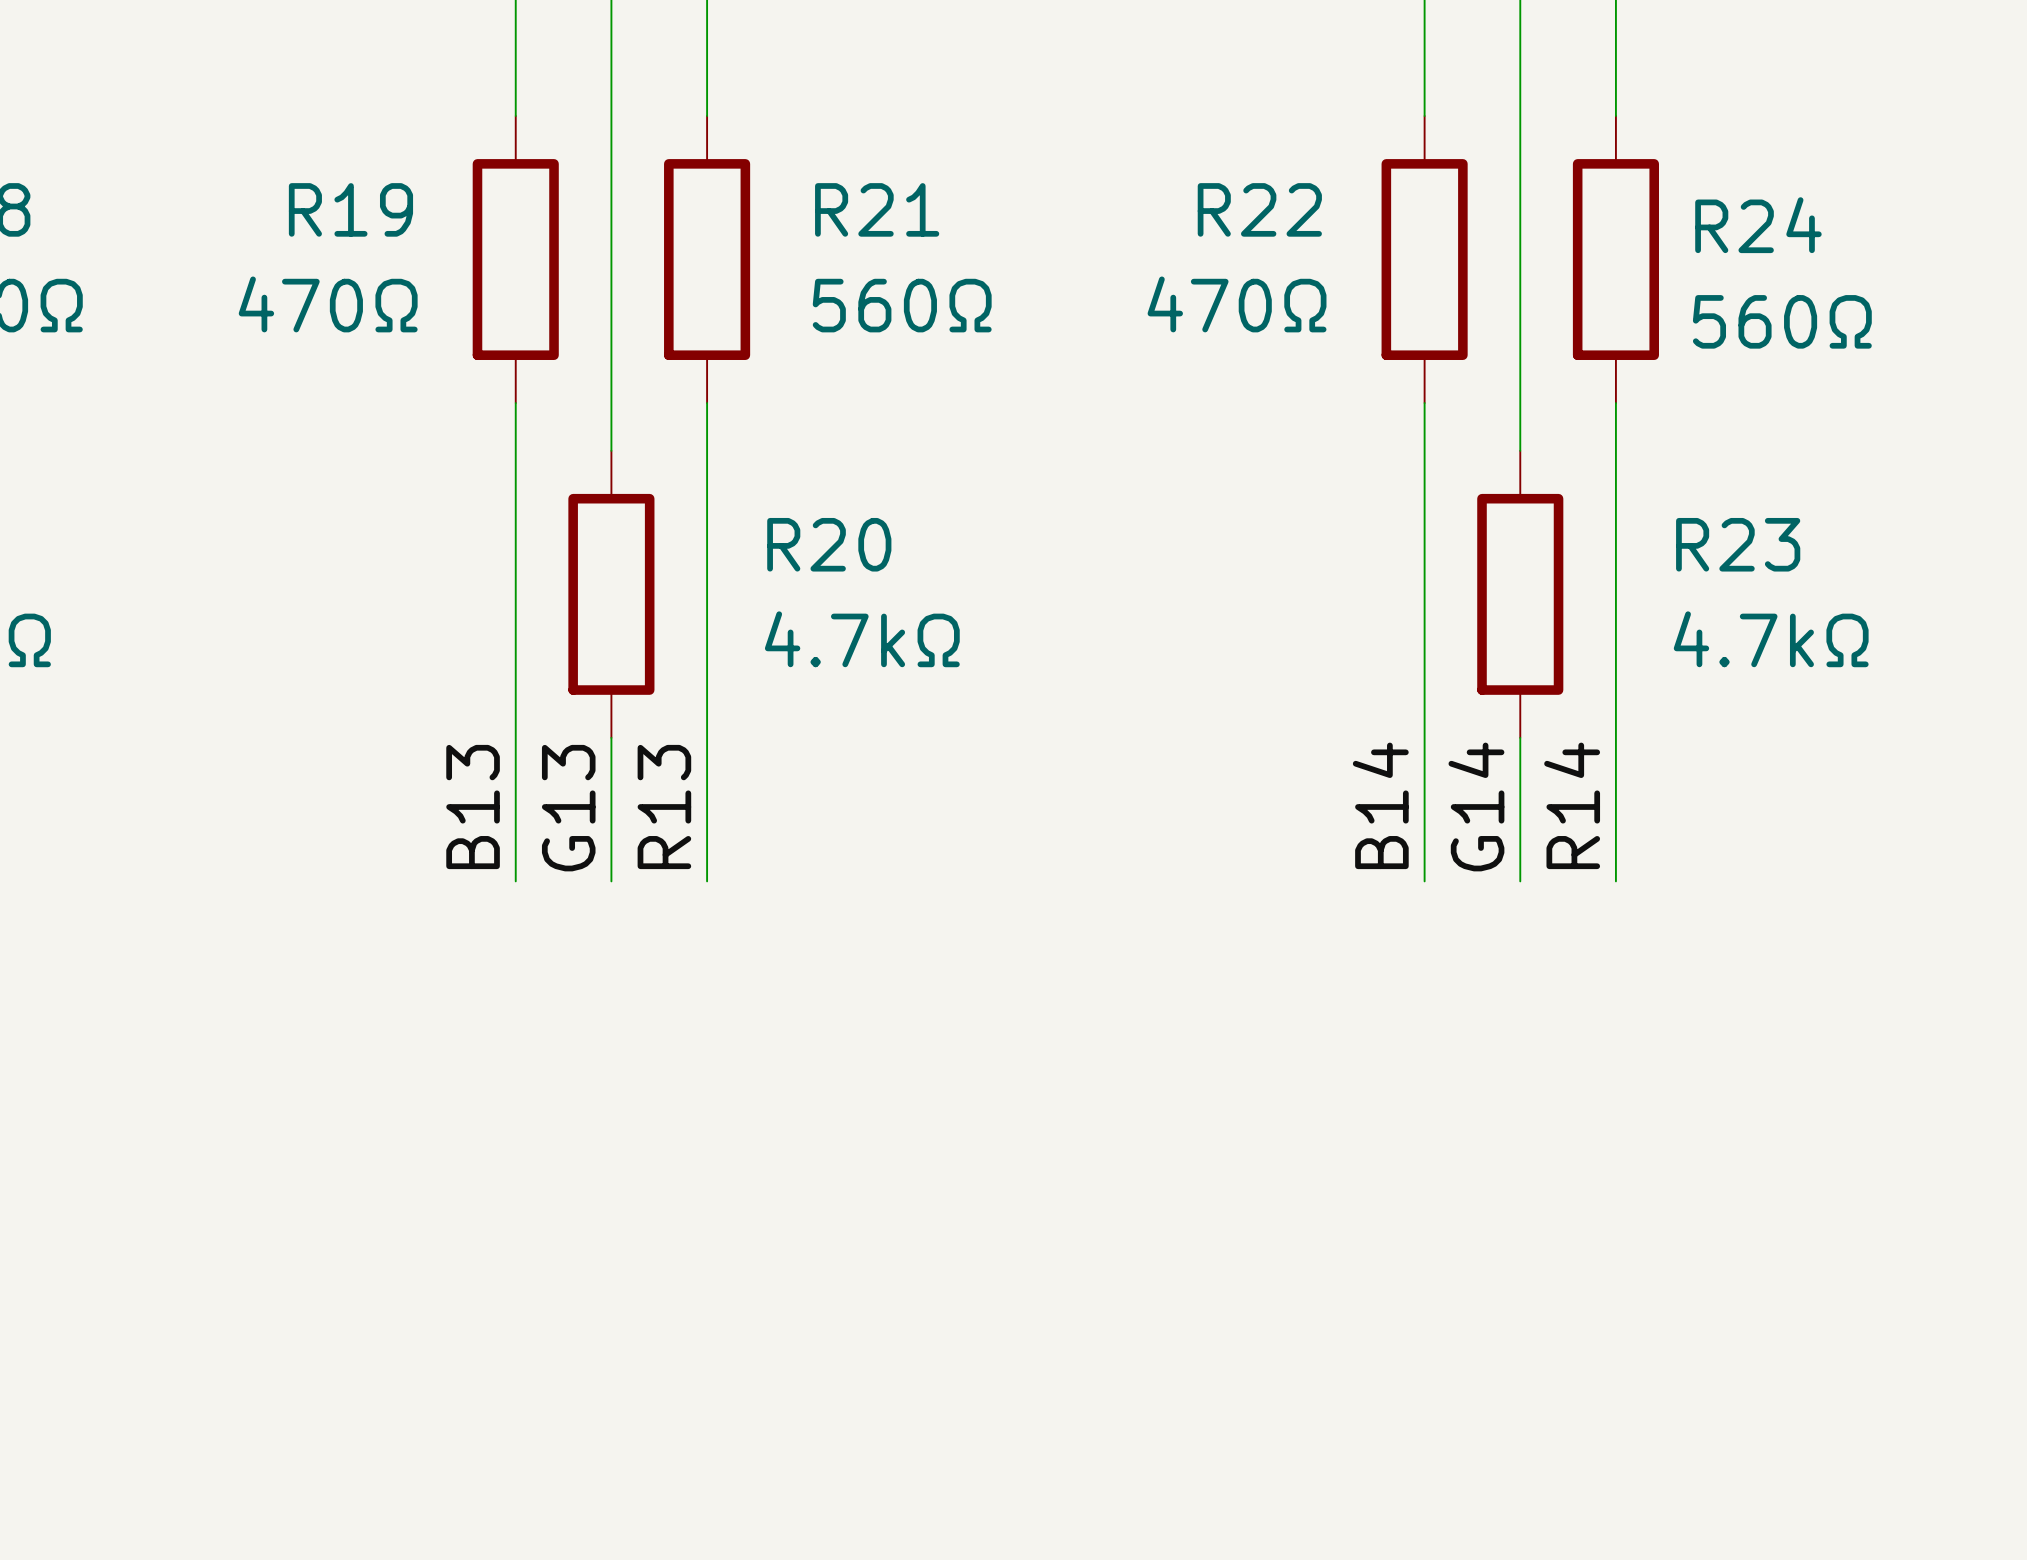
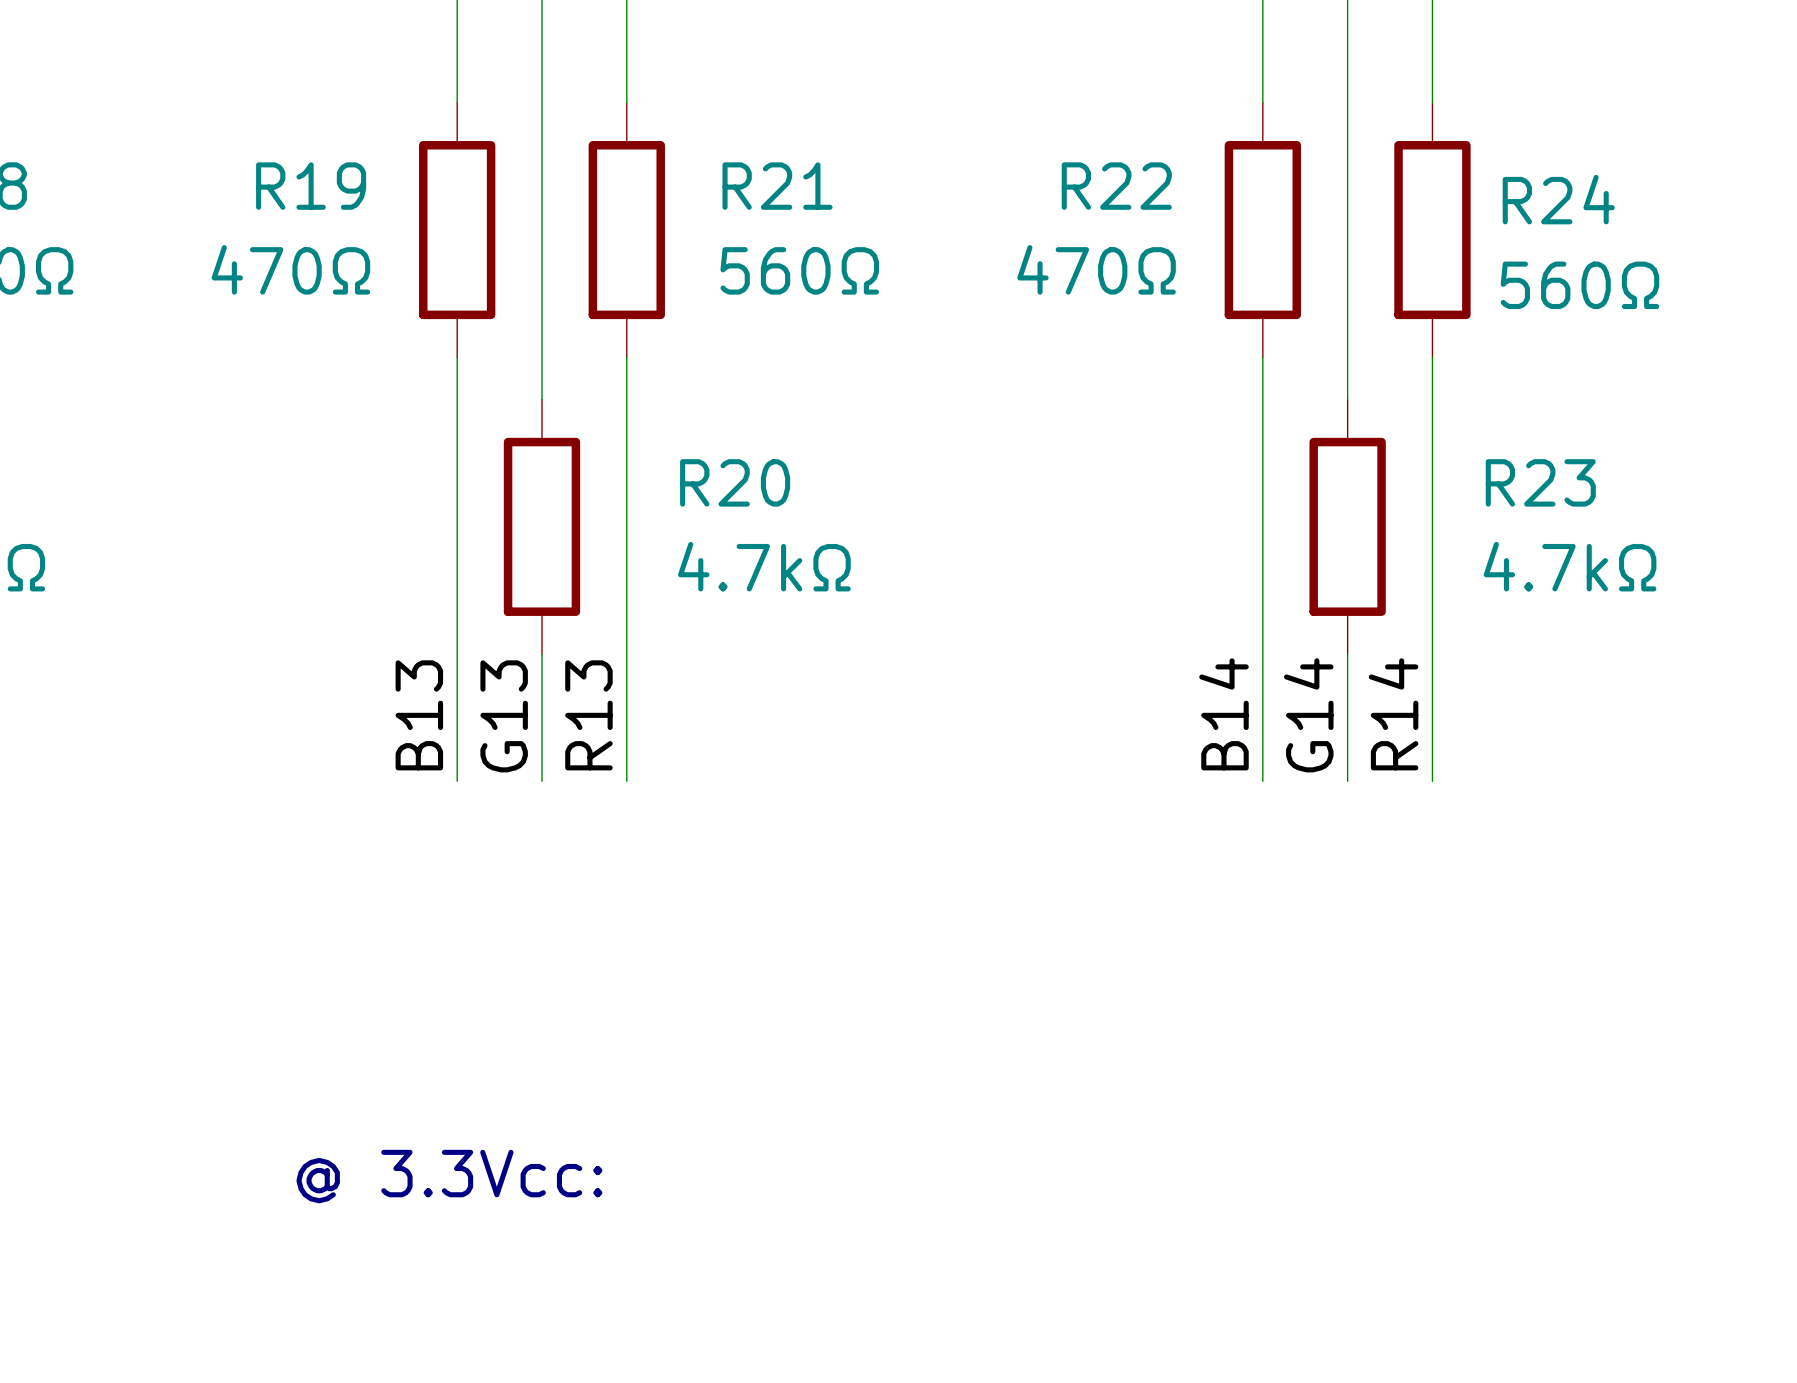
text: none -> @ 3.3Vcc: (449, 1176)

